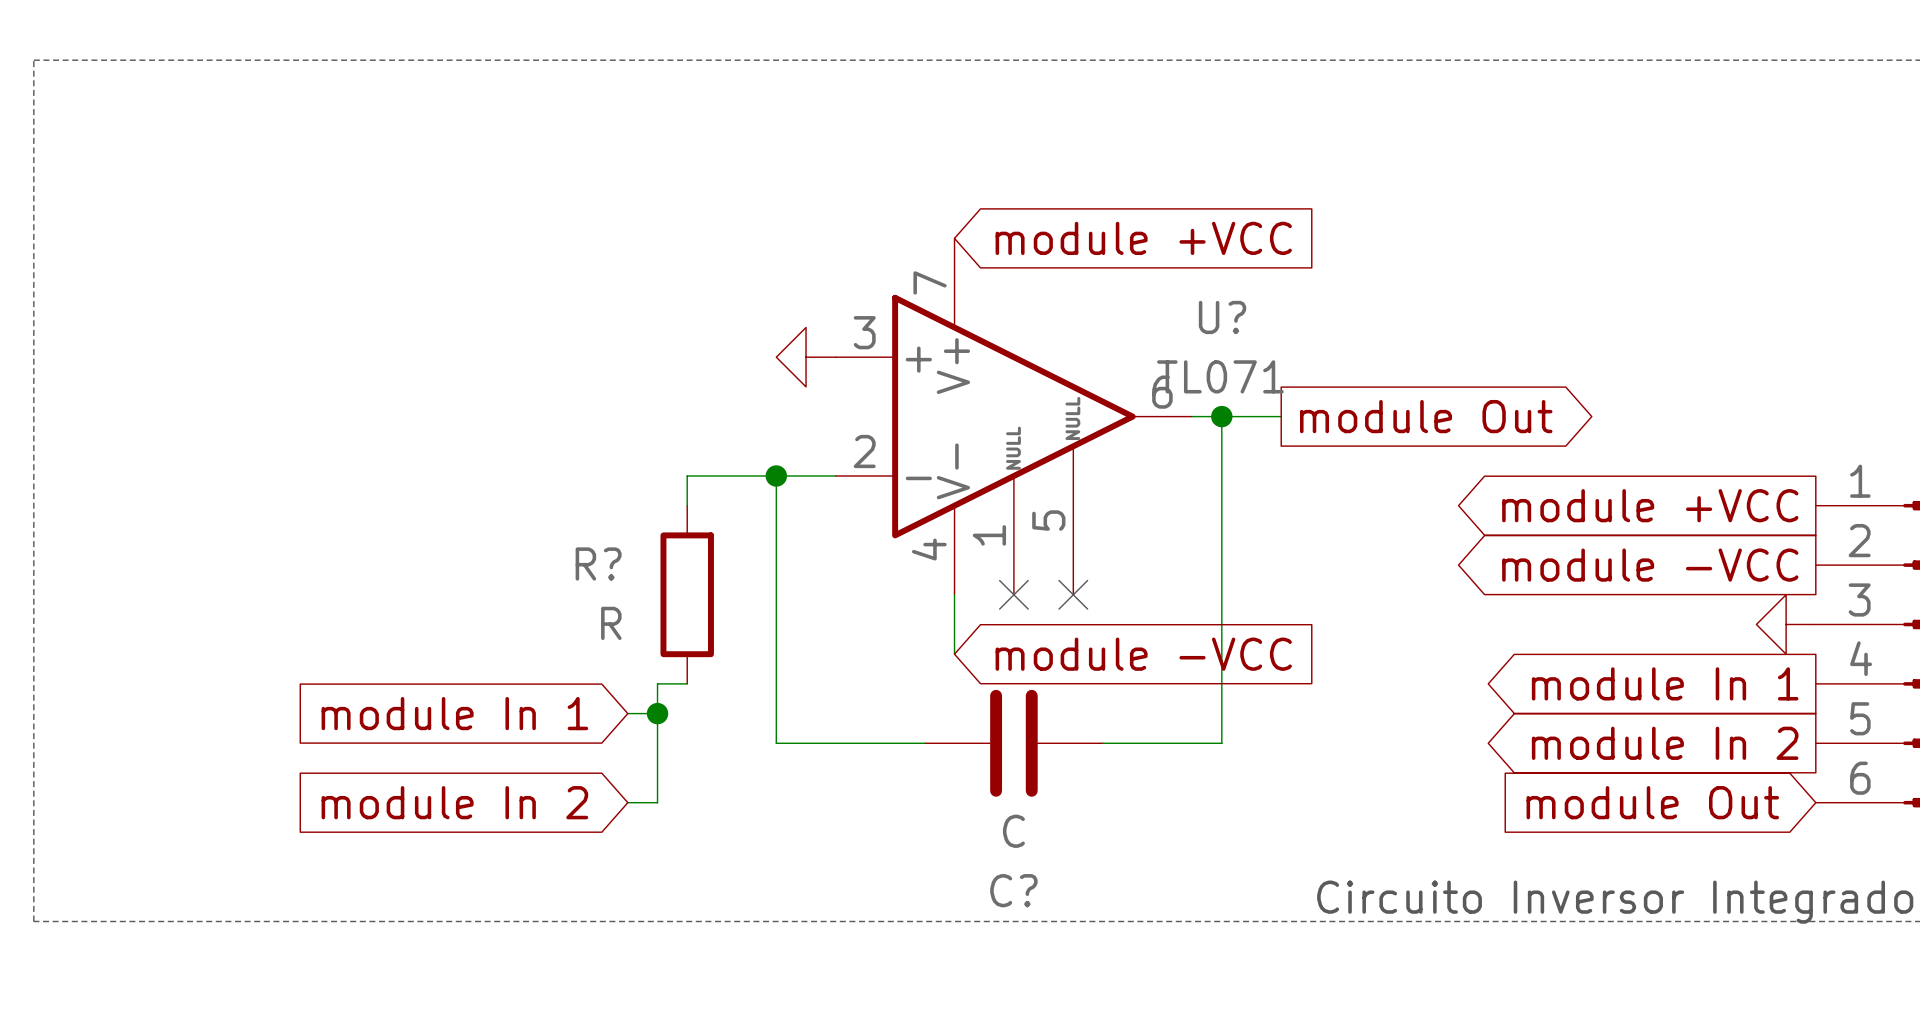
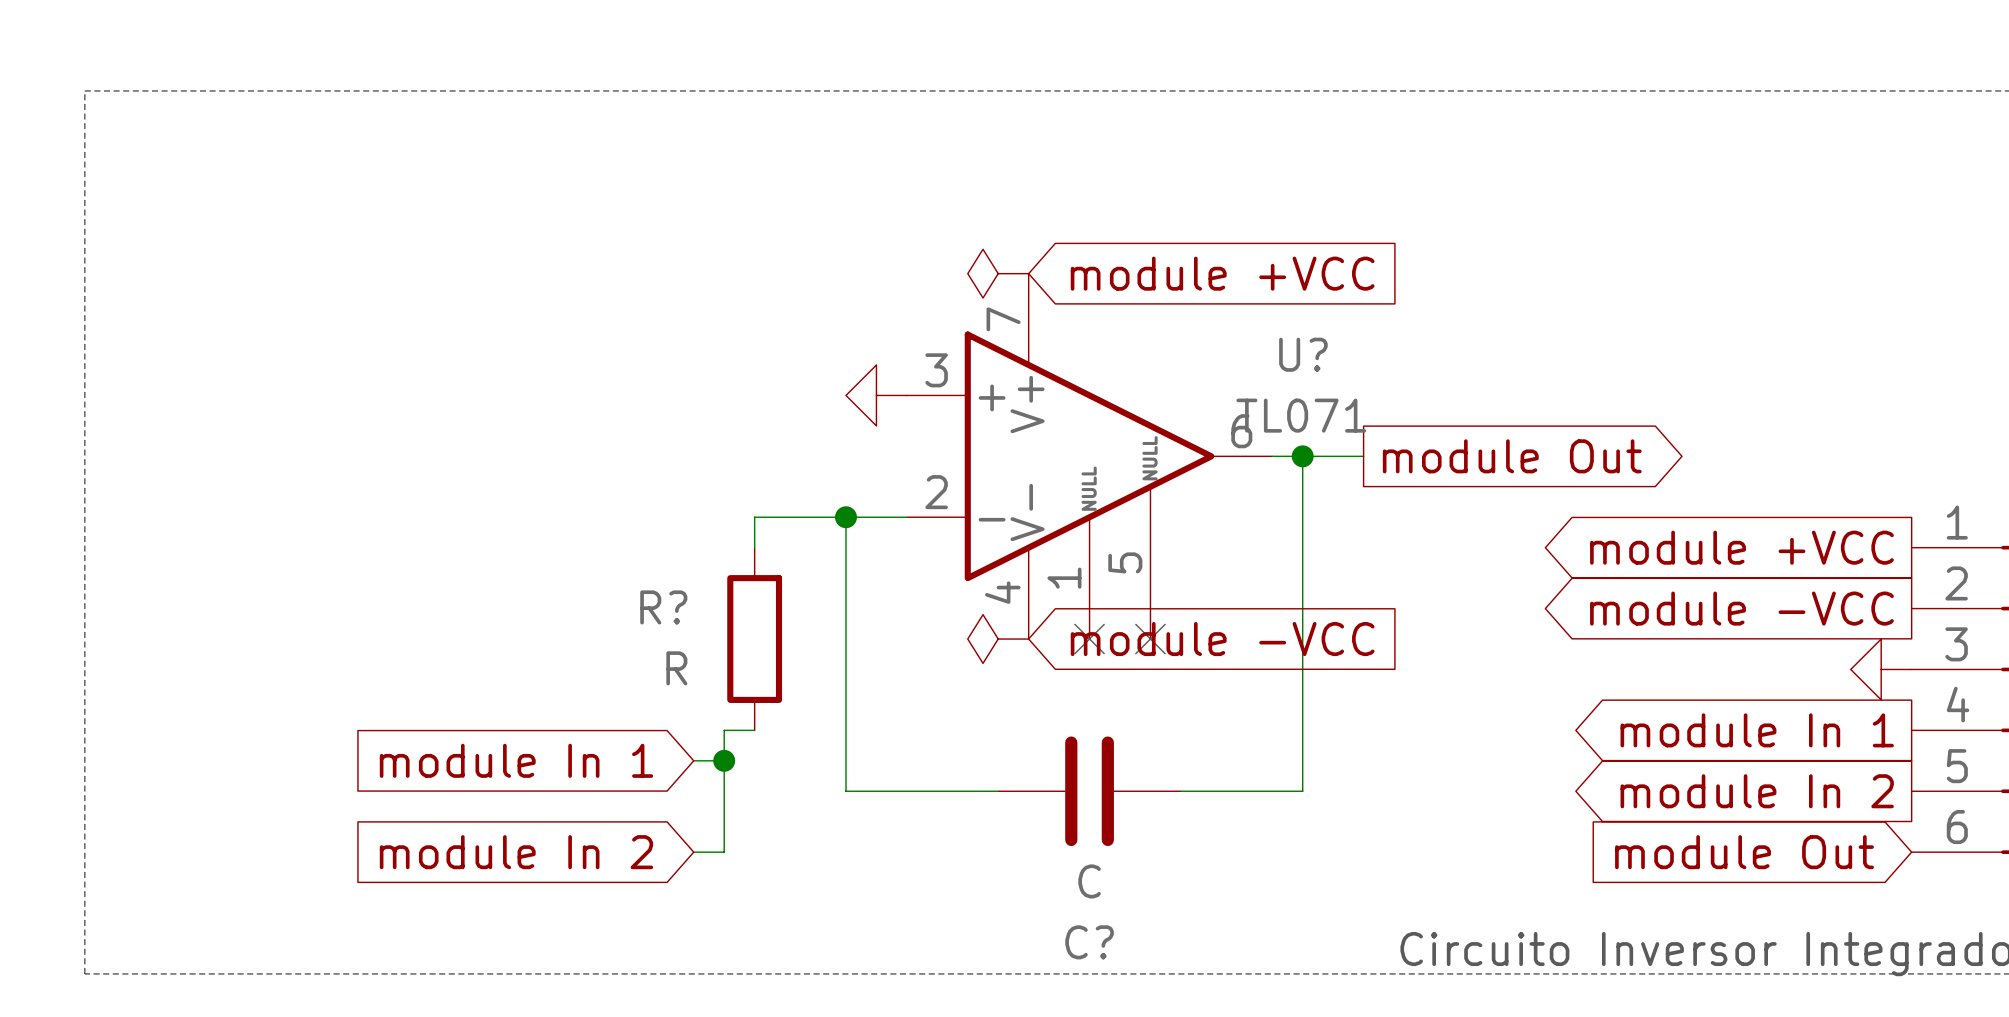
power symbol: none -> (998, 273)
power symbol: none -> (998, 639)
wire: (954, 594) (954, 654) -> none
global label position: module -VCC (1143, 654) -> module -VCC (1222, 639)

